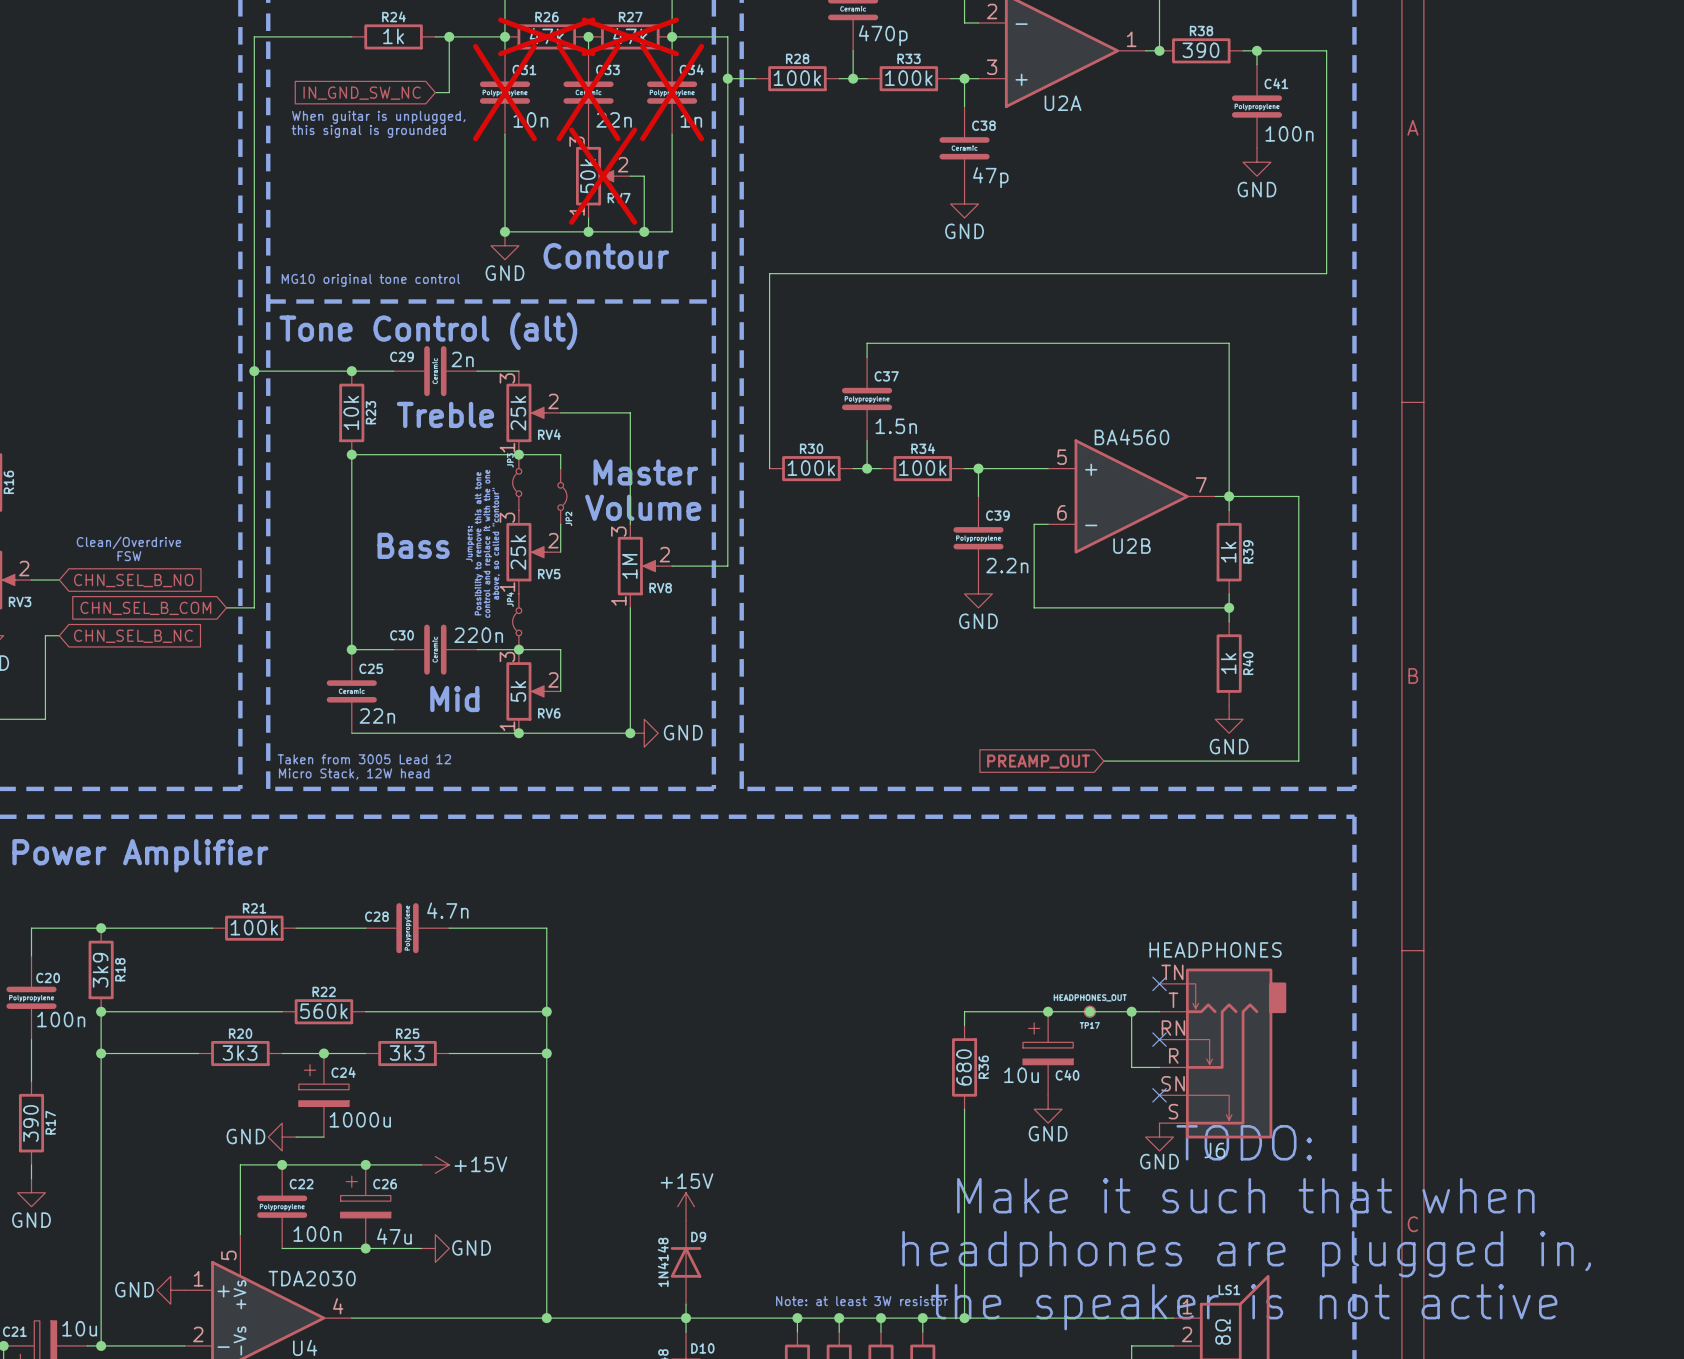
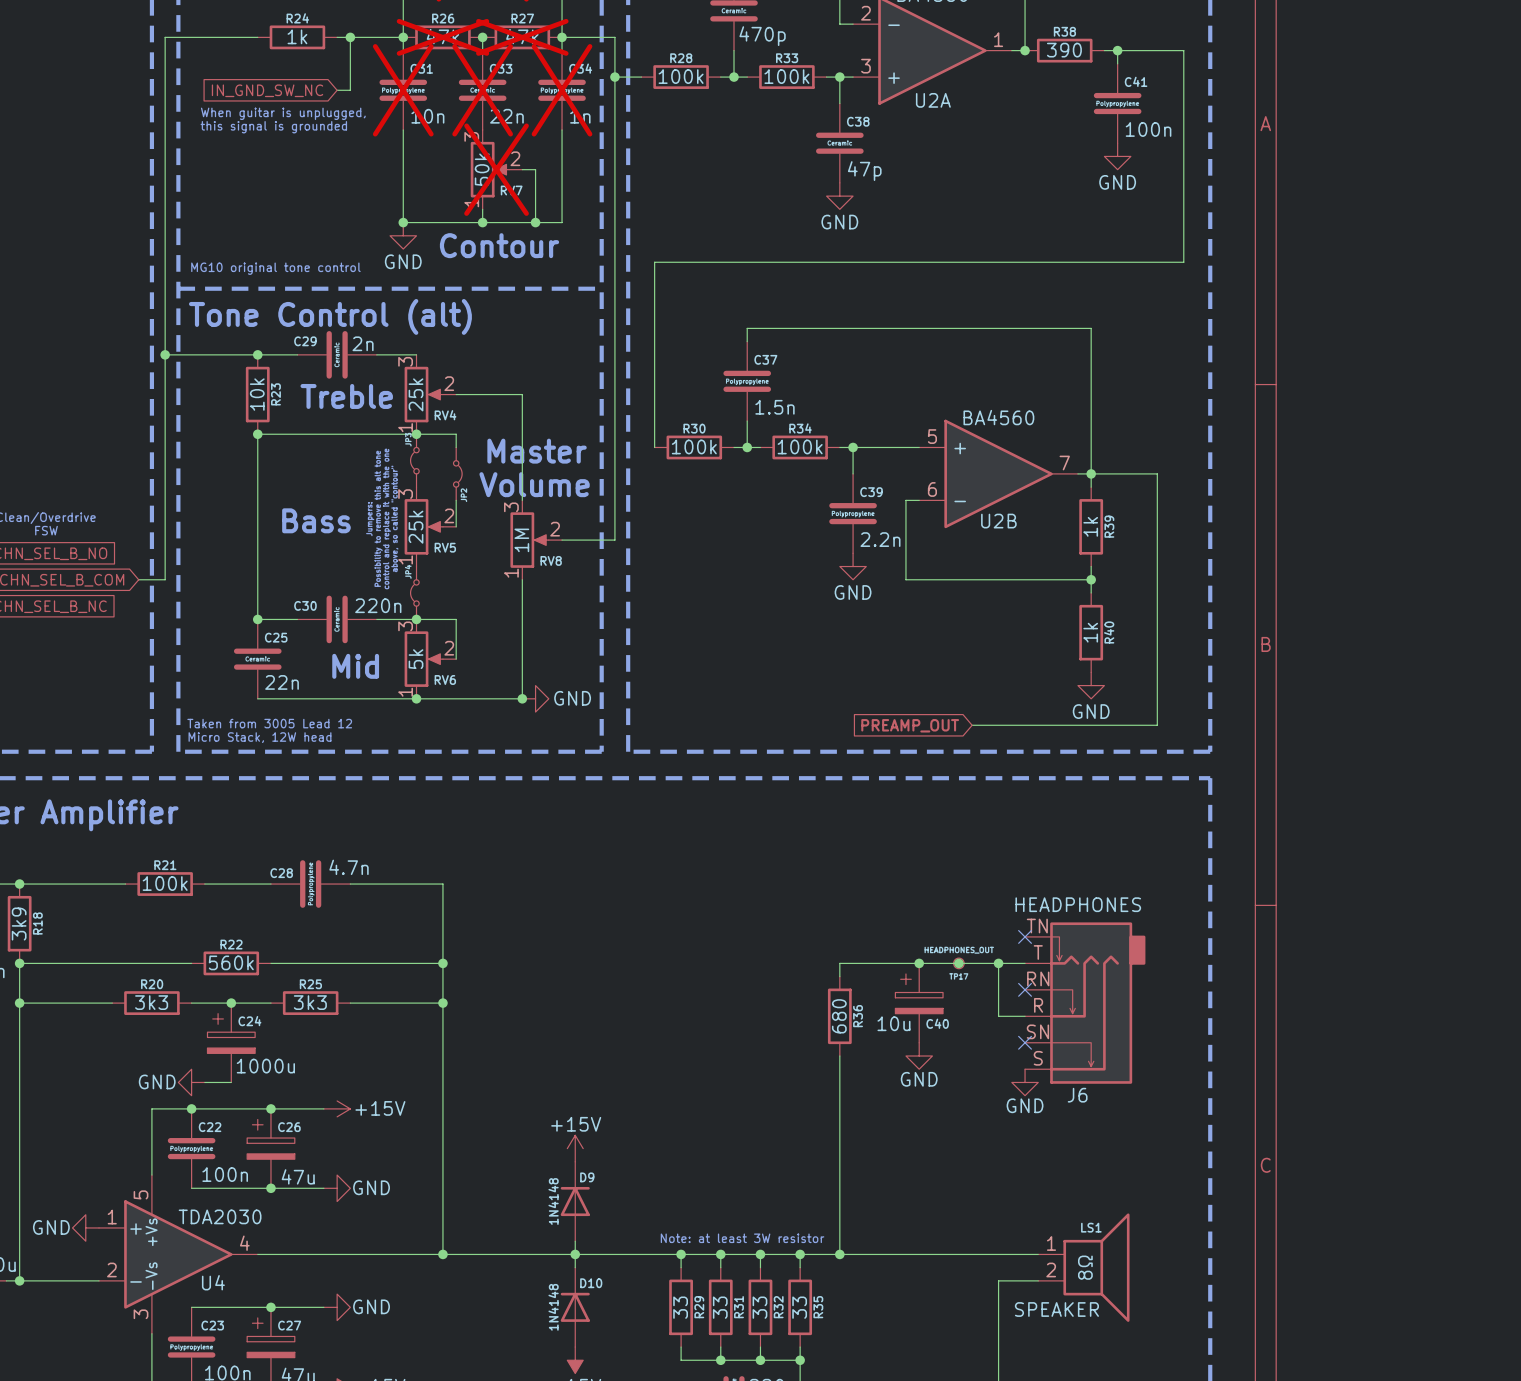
text: TODO: (1244, 1142) -> none
text: Make it such that when (1245, 1195) -> none
text: headphones are plugged in, (1246, 1254) -> none
text: the speaker is not active (1244, 1307) -> none

